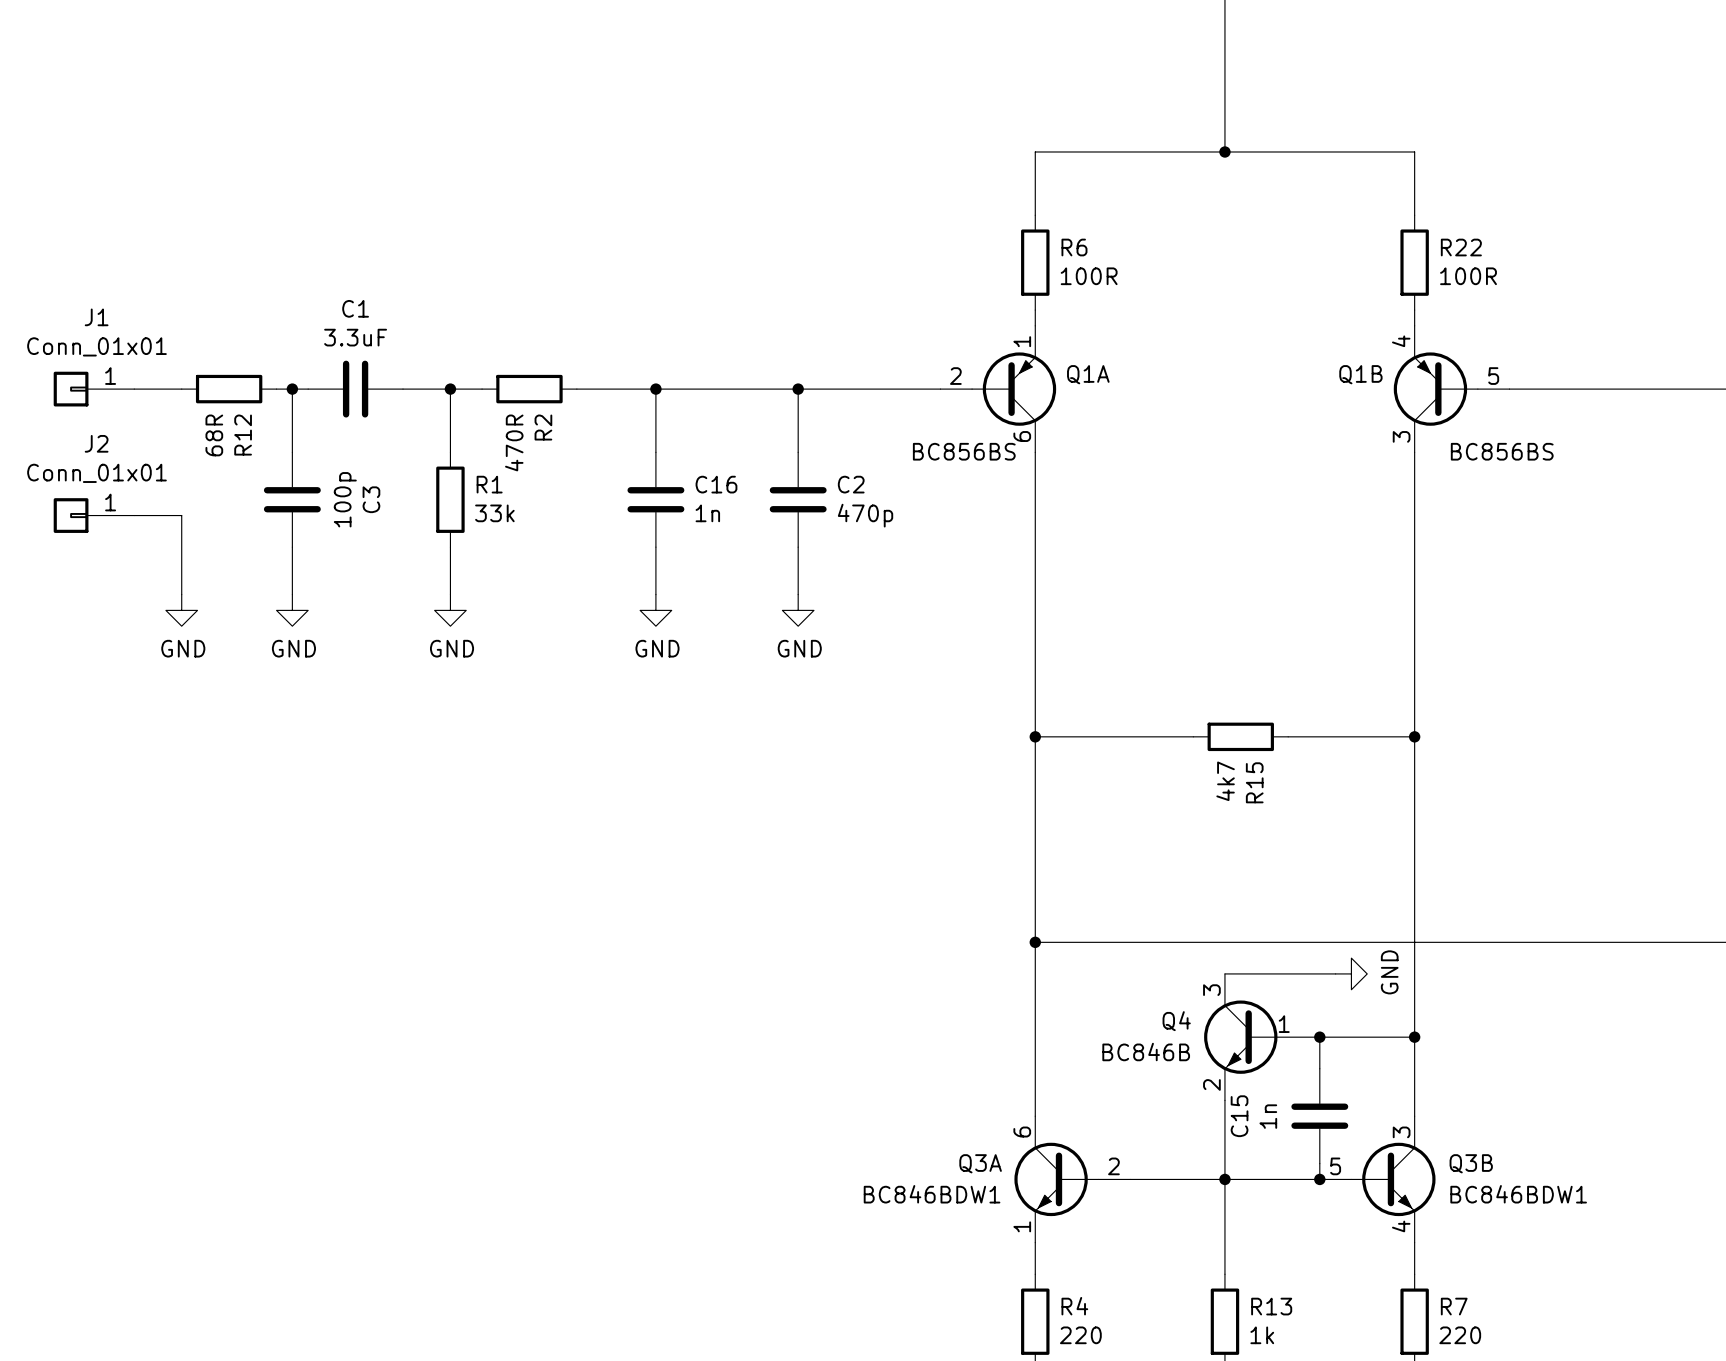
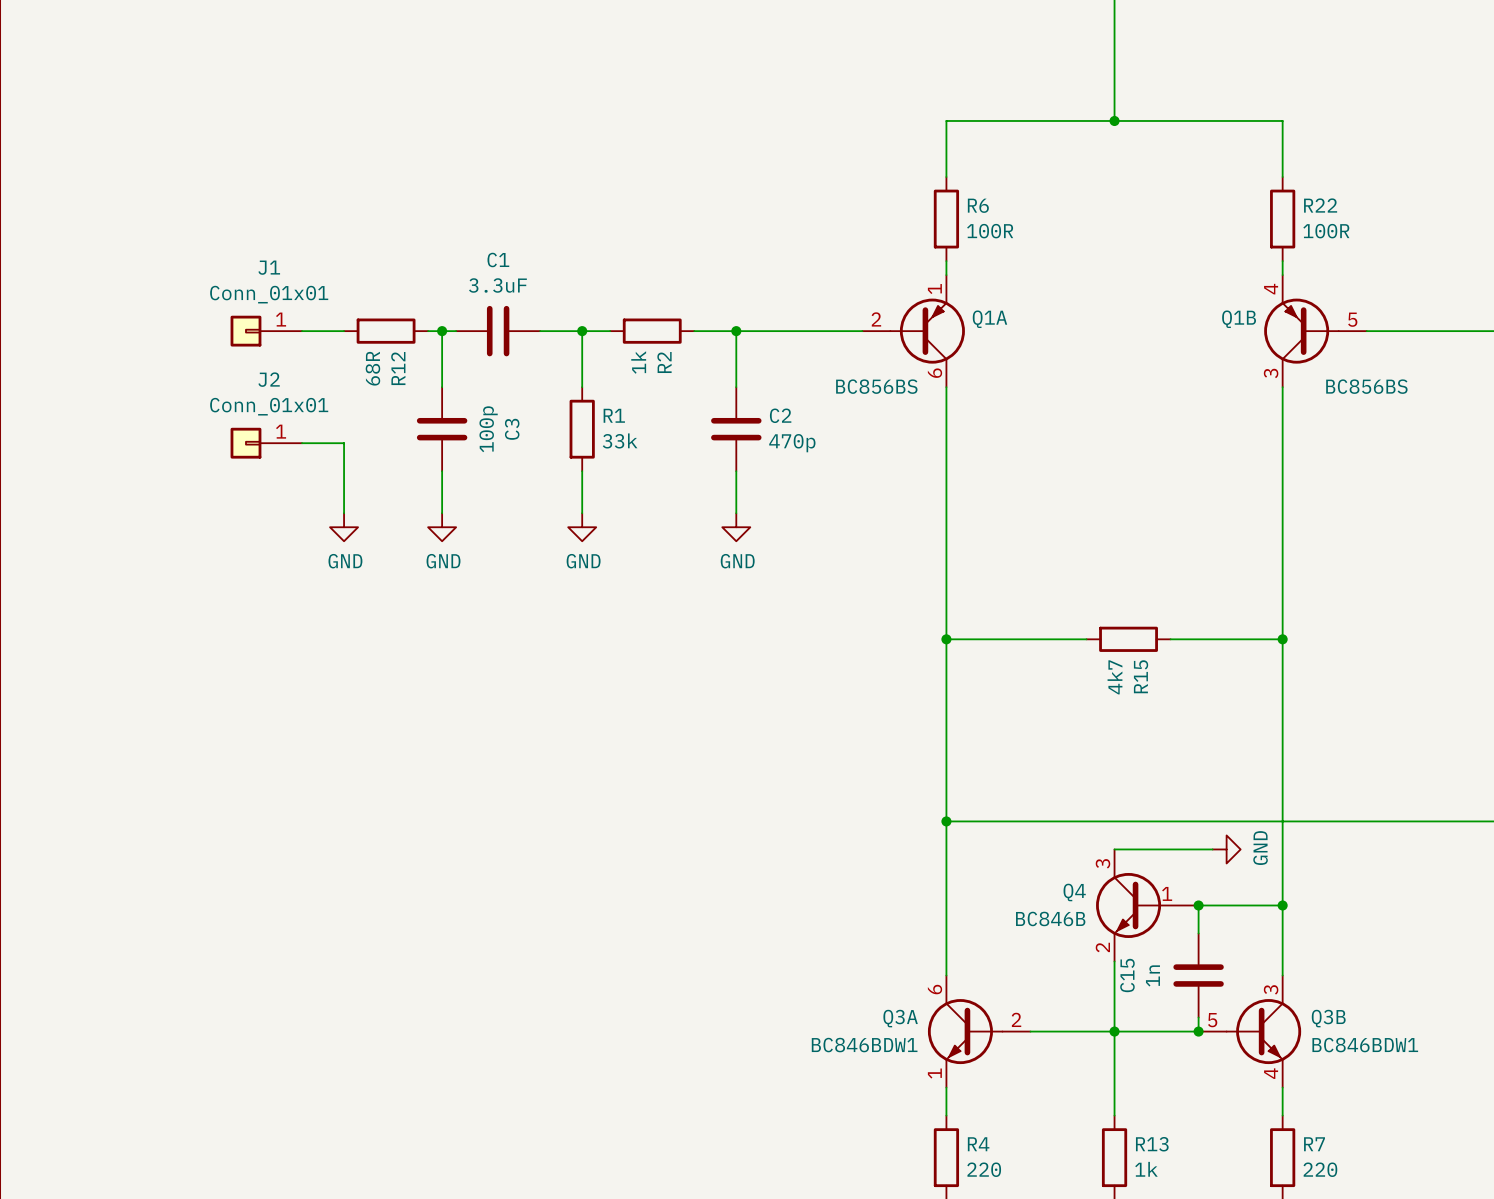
J1 position: (93, 389) -> (266, 331)
wire: (134, 389) (181, 389) -> none
R12 position: (229, 389) -> (386, 331)
wire: (292, 389) (292, 452) -> (442, 331) (442, 387)
junction: (292, 389) -> none
C1 position: (355, 389) -> (498, 331)
wire: (403, 389) (450, 389) (450, 452) -> none
junction position: (450, 389) -> (442, 331)
R2 position: (529, 389) -> (652, 331)
wire: none -> (582, 331) (582, 387)
junction position: (655, 389) -> (582, 331)
wire: (750, 389) (655, 389) (655, 452) -> none
R2 value: 470R (514, 442) -> 1k (638, 362)
C3 position: (292, 499) -> (442, 429)
R1 position: (450, 499) -> (582, 429)
C16: 1n (655, 499) -> none
J2 position: (93, 515) -> (266, 443)
wire: (134, 515) (181, 515) (181, 594) -> (302, 443) (344, 443) (344, 513)
wire: (292, 547) (292, 594) -> (442, 471) (442, 513)
wire: (450, 547) (450, 594) -> (582, 471) (582, 513)
wire: (655, 547) (655, 594) -> none
power symbol: GND (181, 610) -> none
power symbol: GND (292, 610) -> none
power symbol: none -> GND (344, 527)
power symbol position: GND (450, 610) -> GND (442, 527)
power symbol position: GND (655, 610) -> GND (582, 527)

